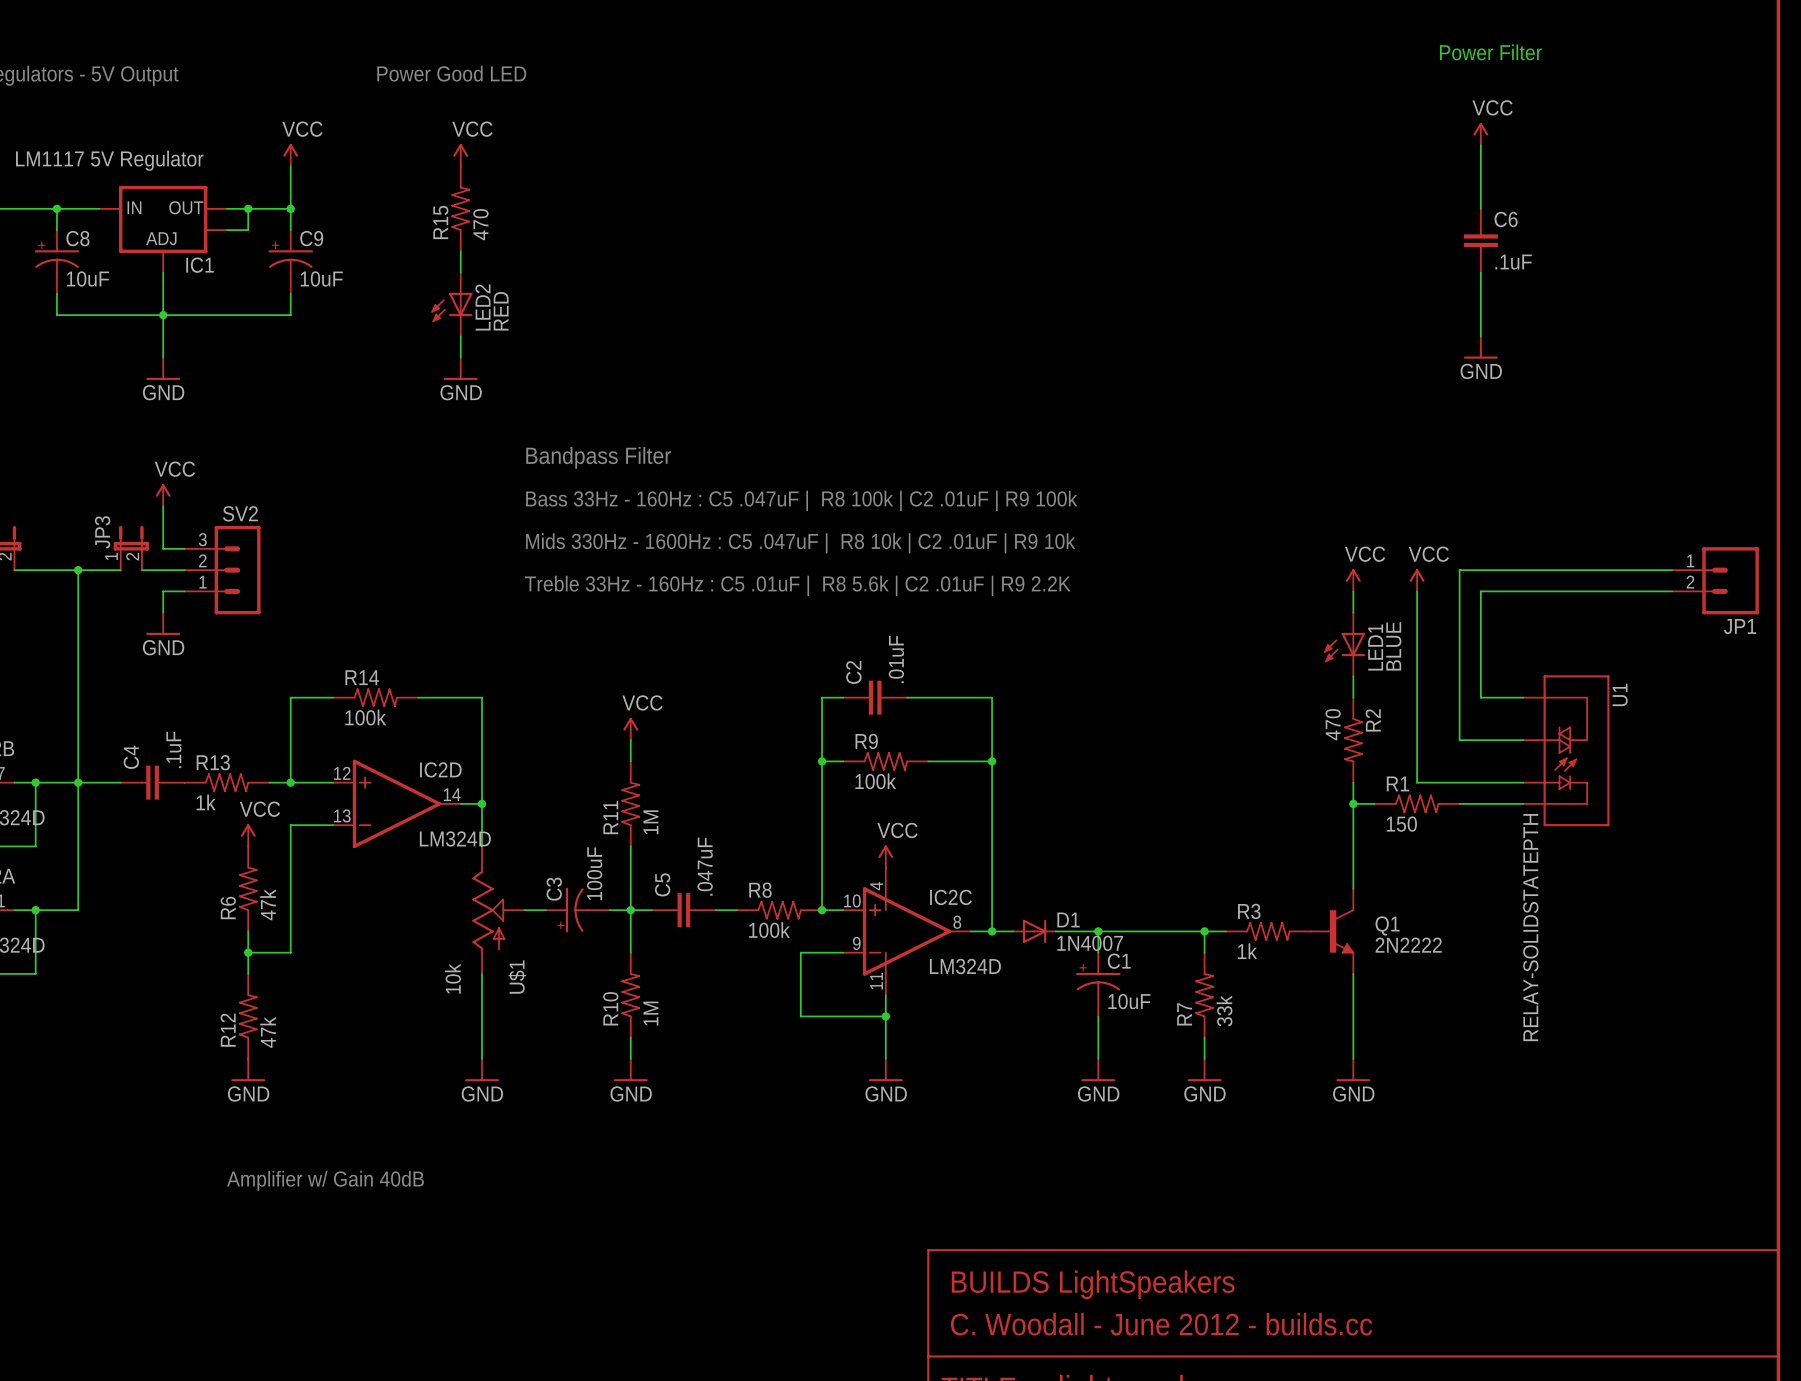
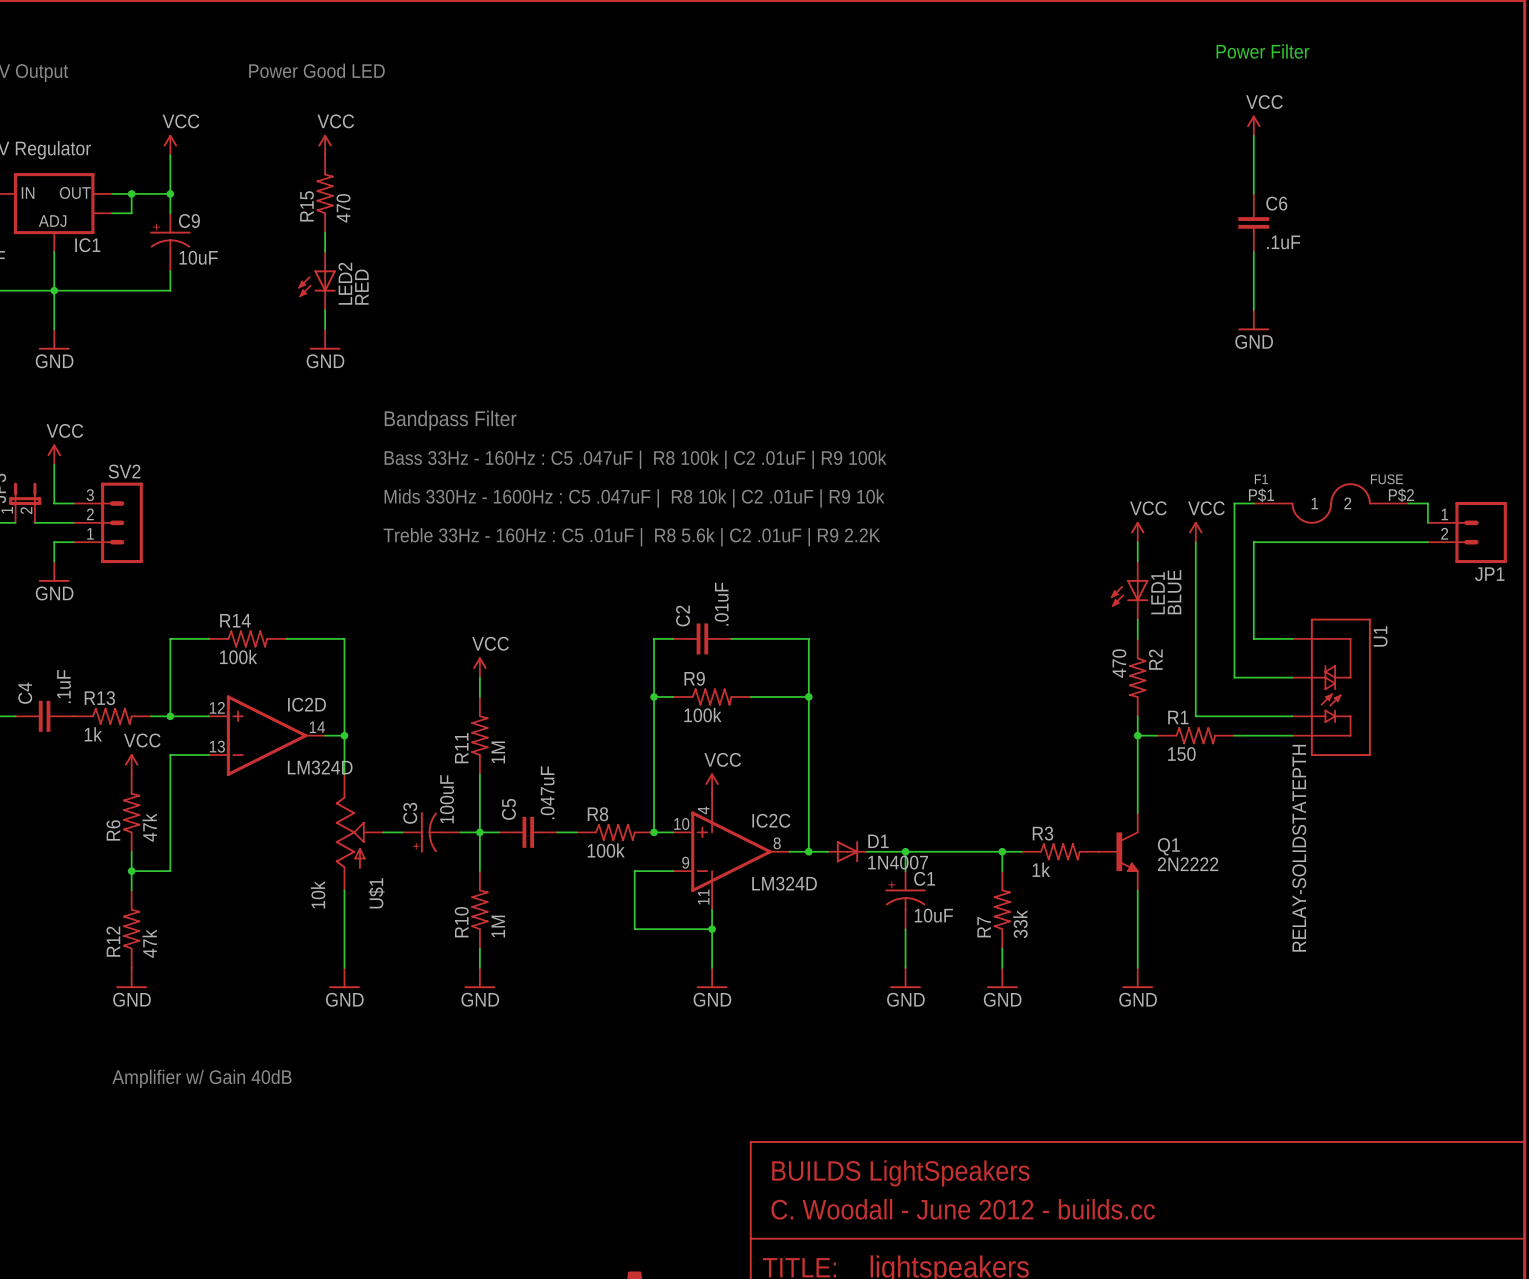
F1: none -> FUSE (1331, 503)
wire: none -> (1408, 503) (1427, 503) (1427, 522)
wire: (1459, 570) (1672, 570) -> (1234, 522) (1234, 503) (1253, 503)

